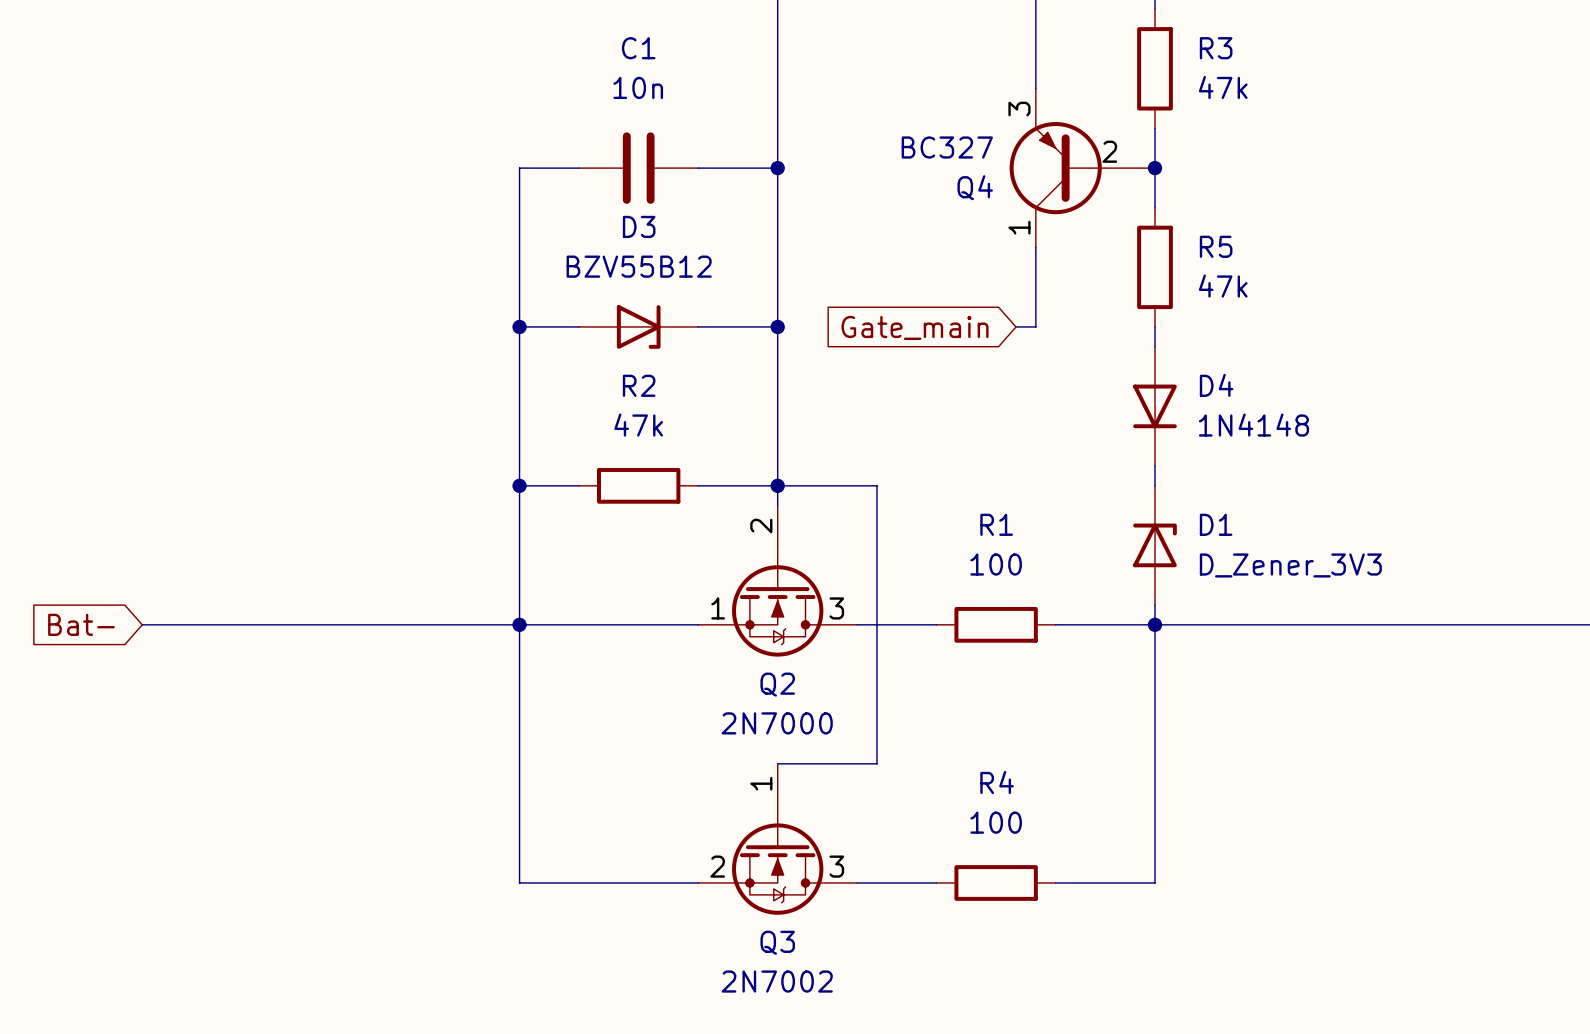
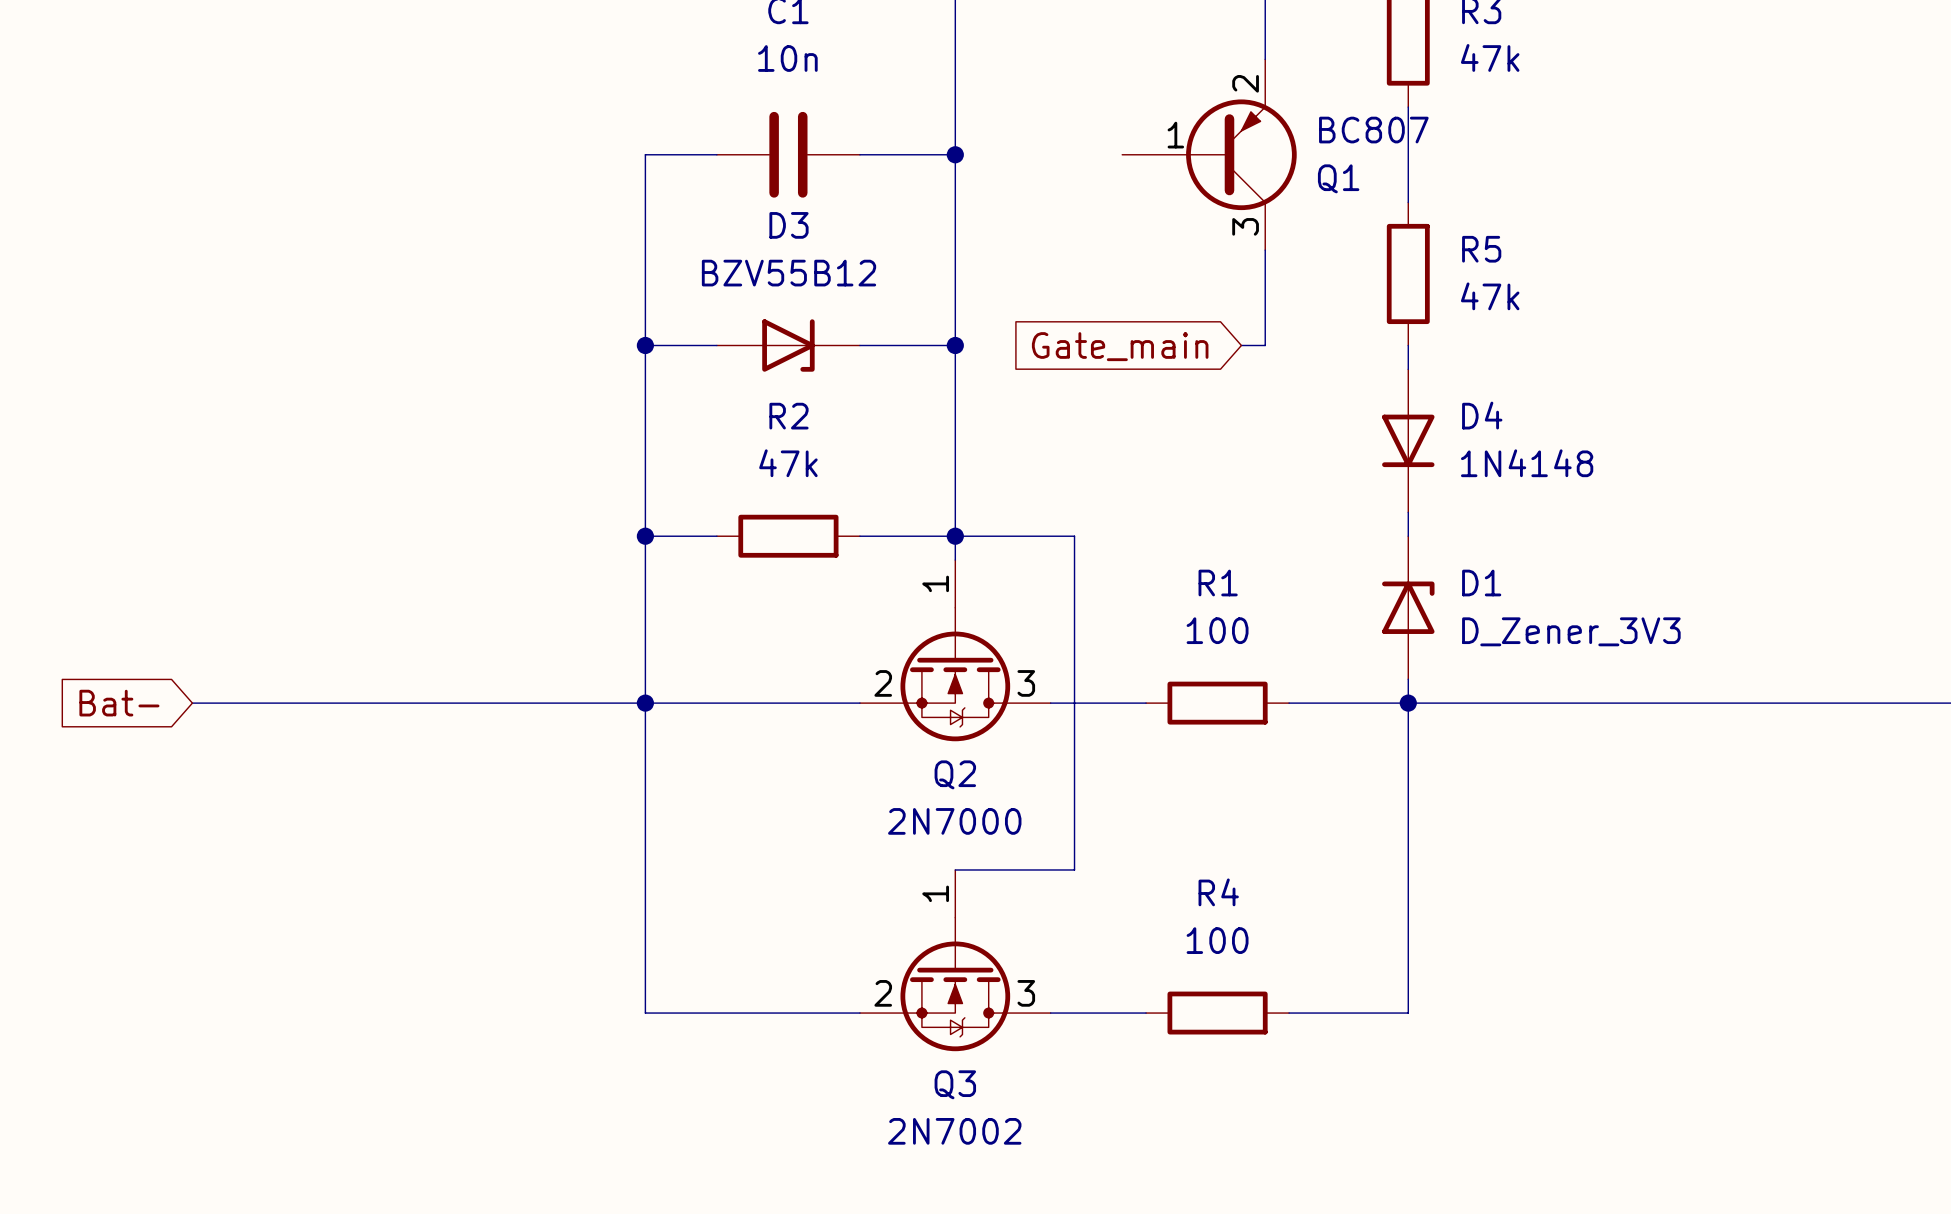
Q1: none -> BC807 (1209, 154)
Q4: BC327 (1082, 168) -> none
junction: (1154, 168) -> none
Q2 pin number: 2 (761, 526) -> 1 (935, 583)
Q2 pin number: 1 (718, 608) -> 2 (883, 683)

